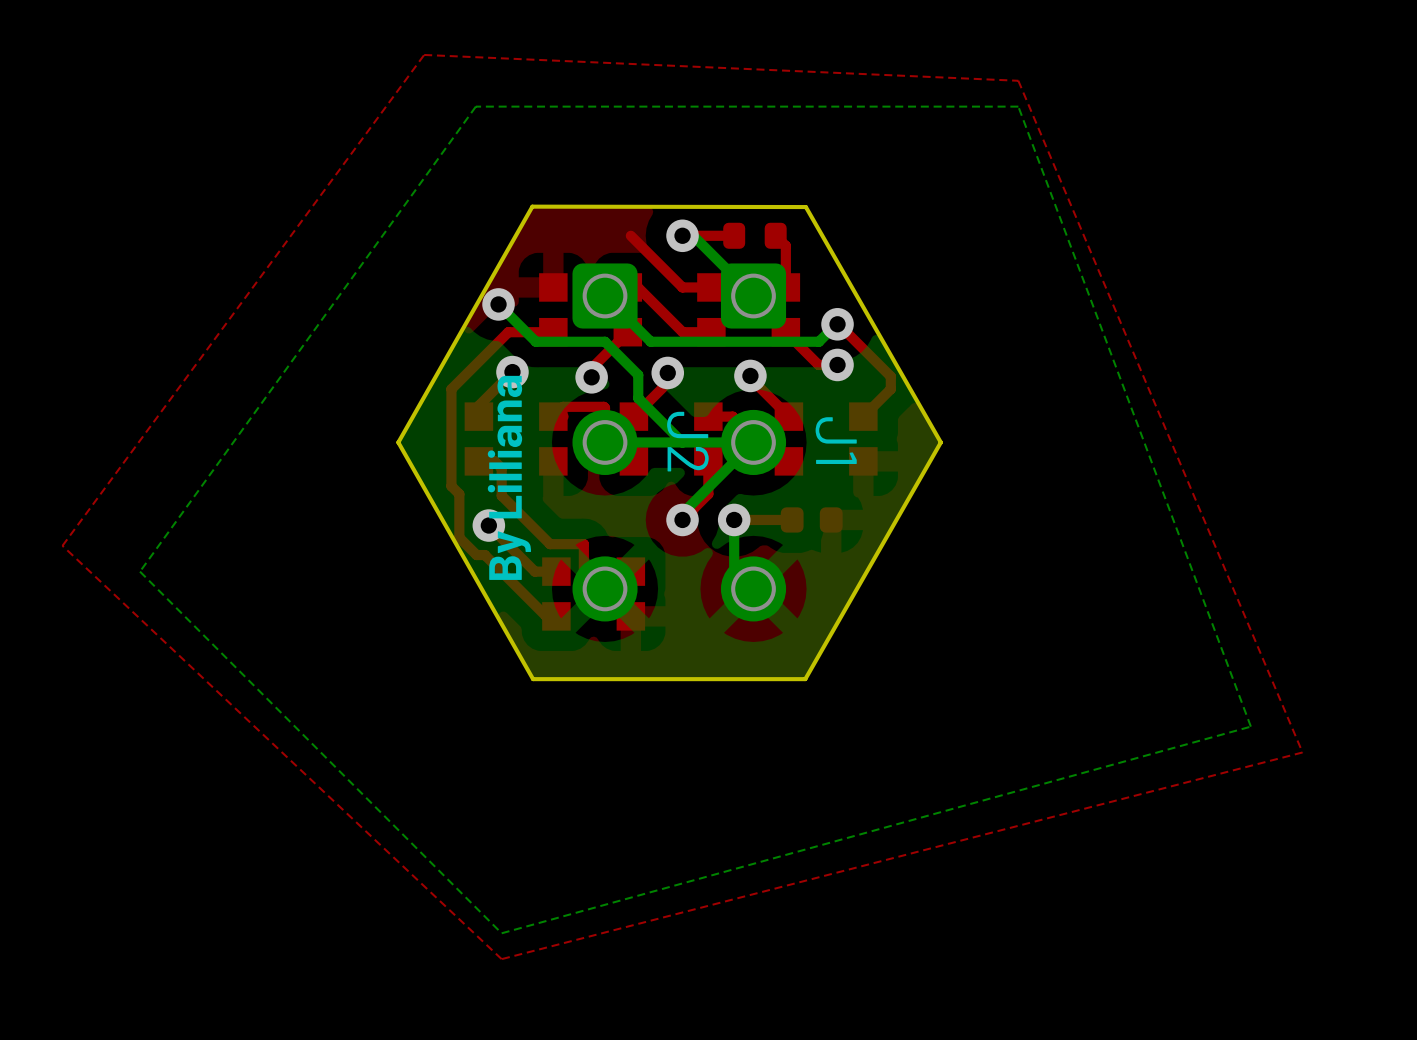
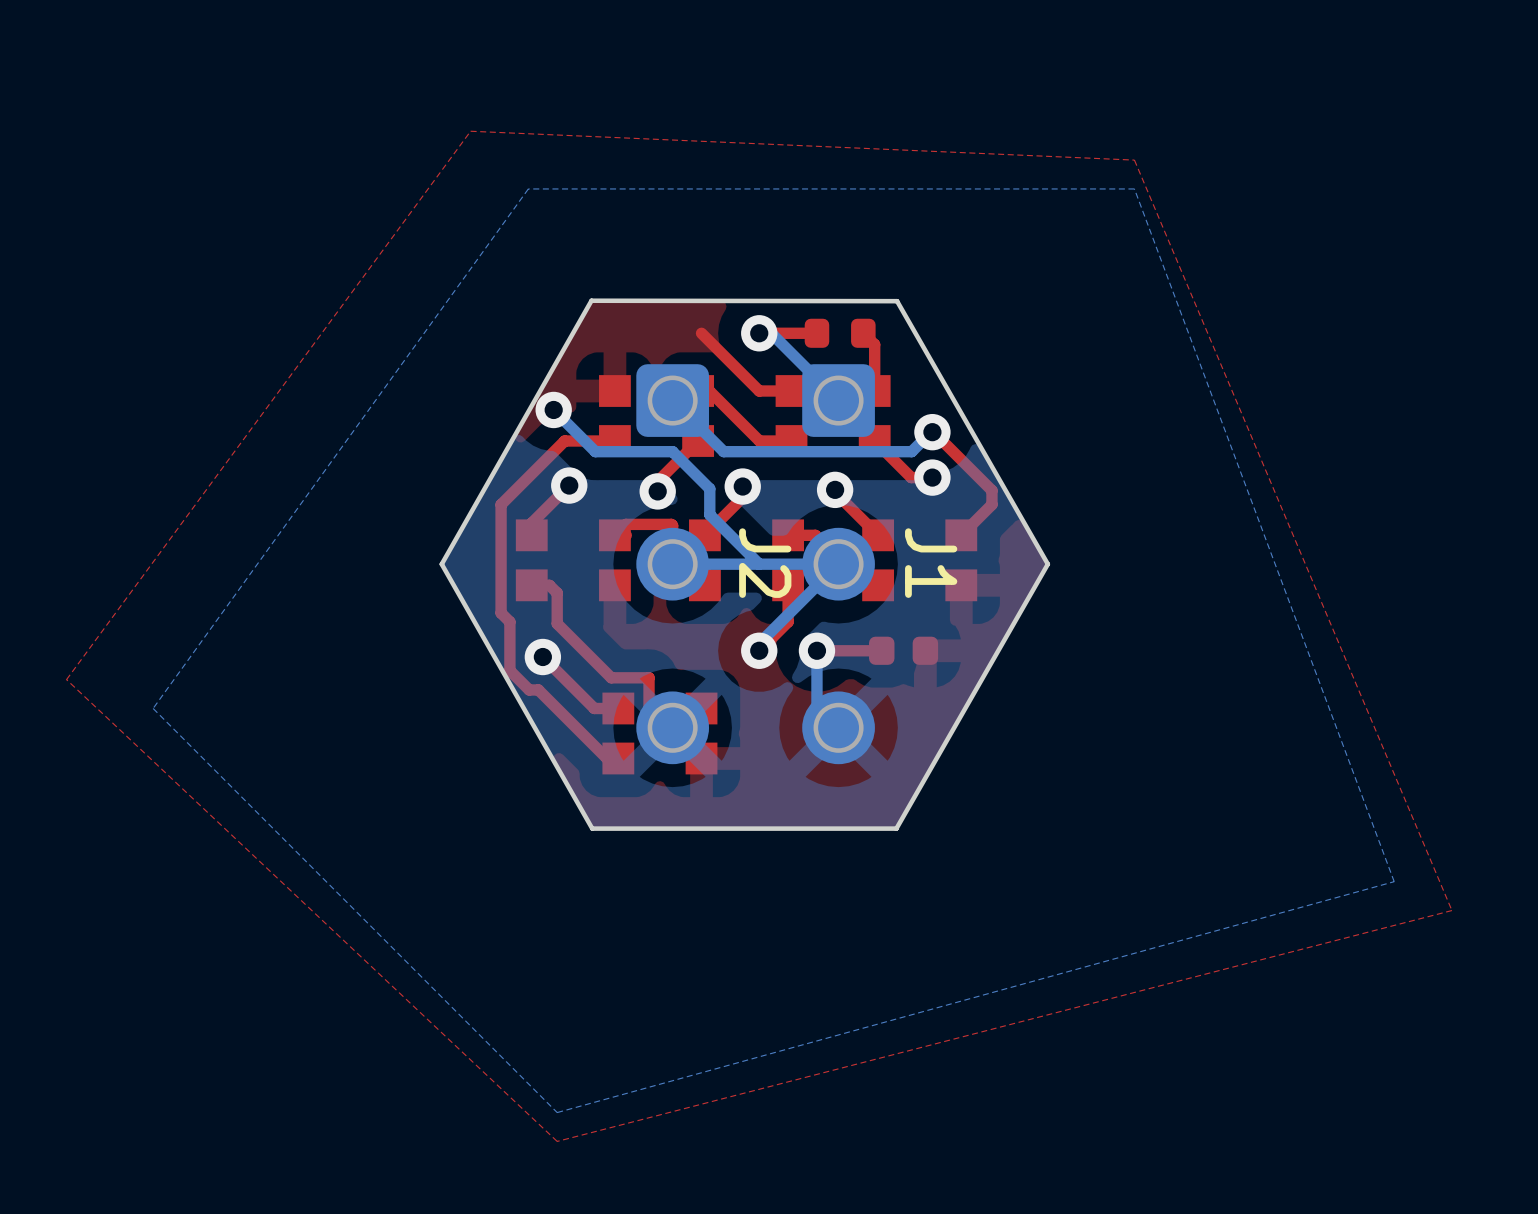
text: By Lilliana (509, 477) -> none

